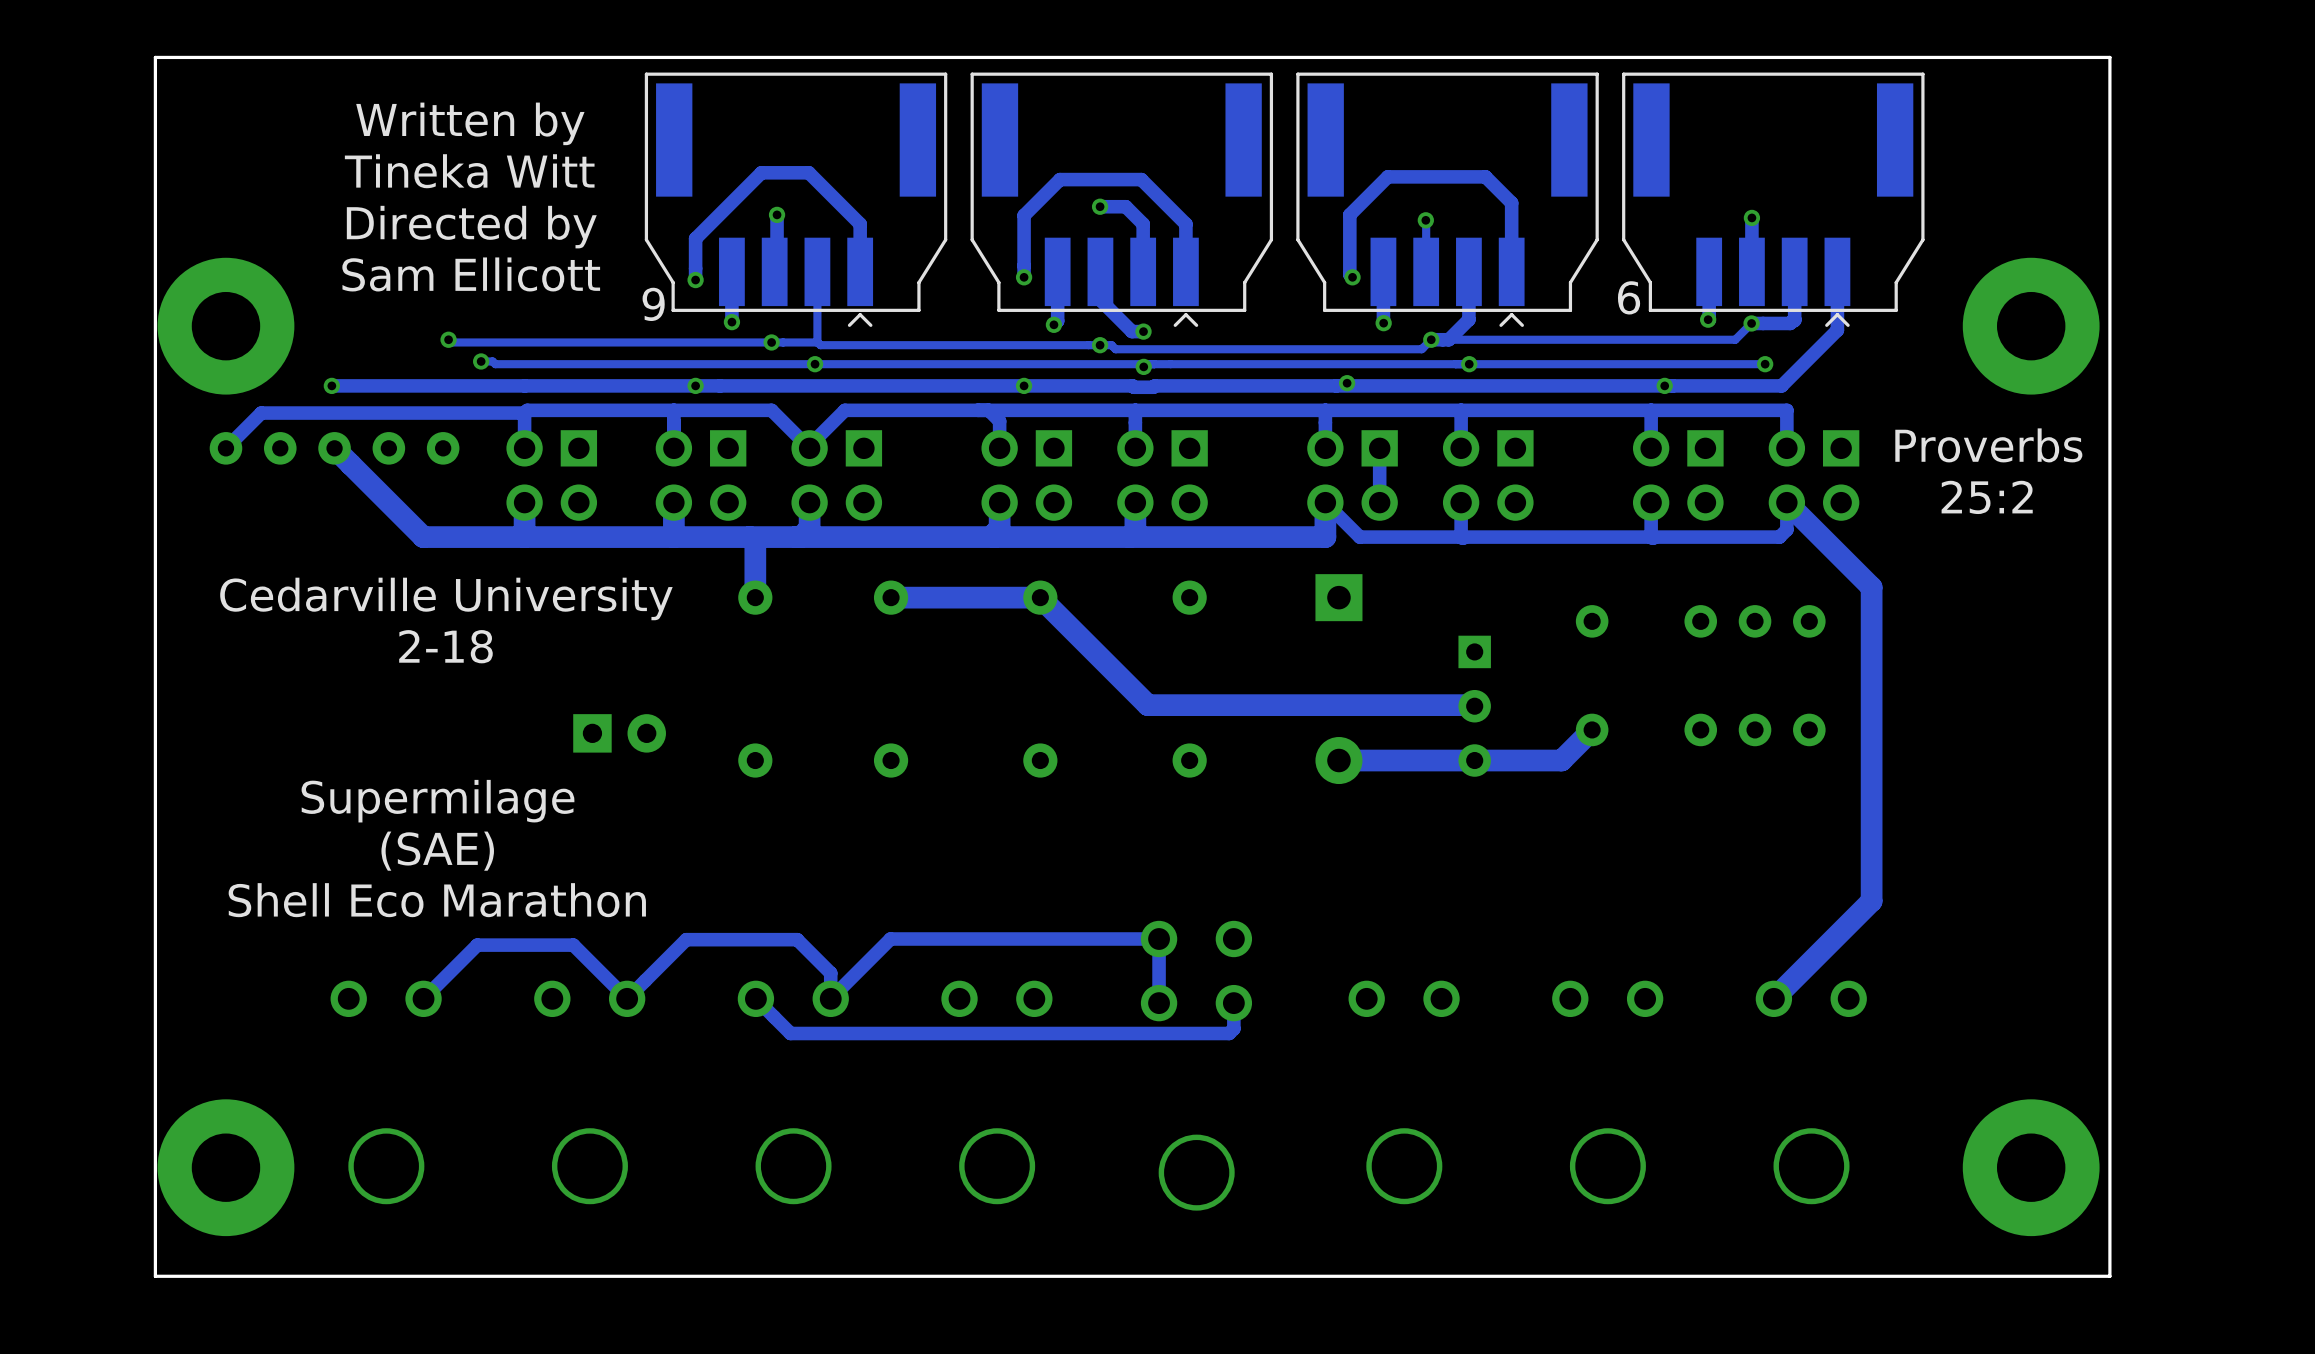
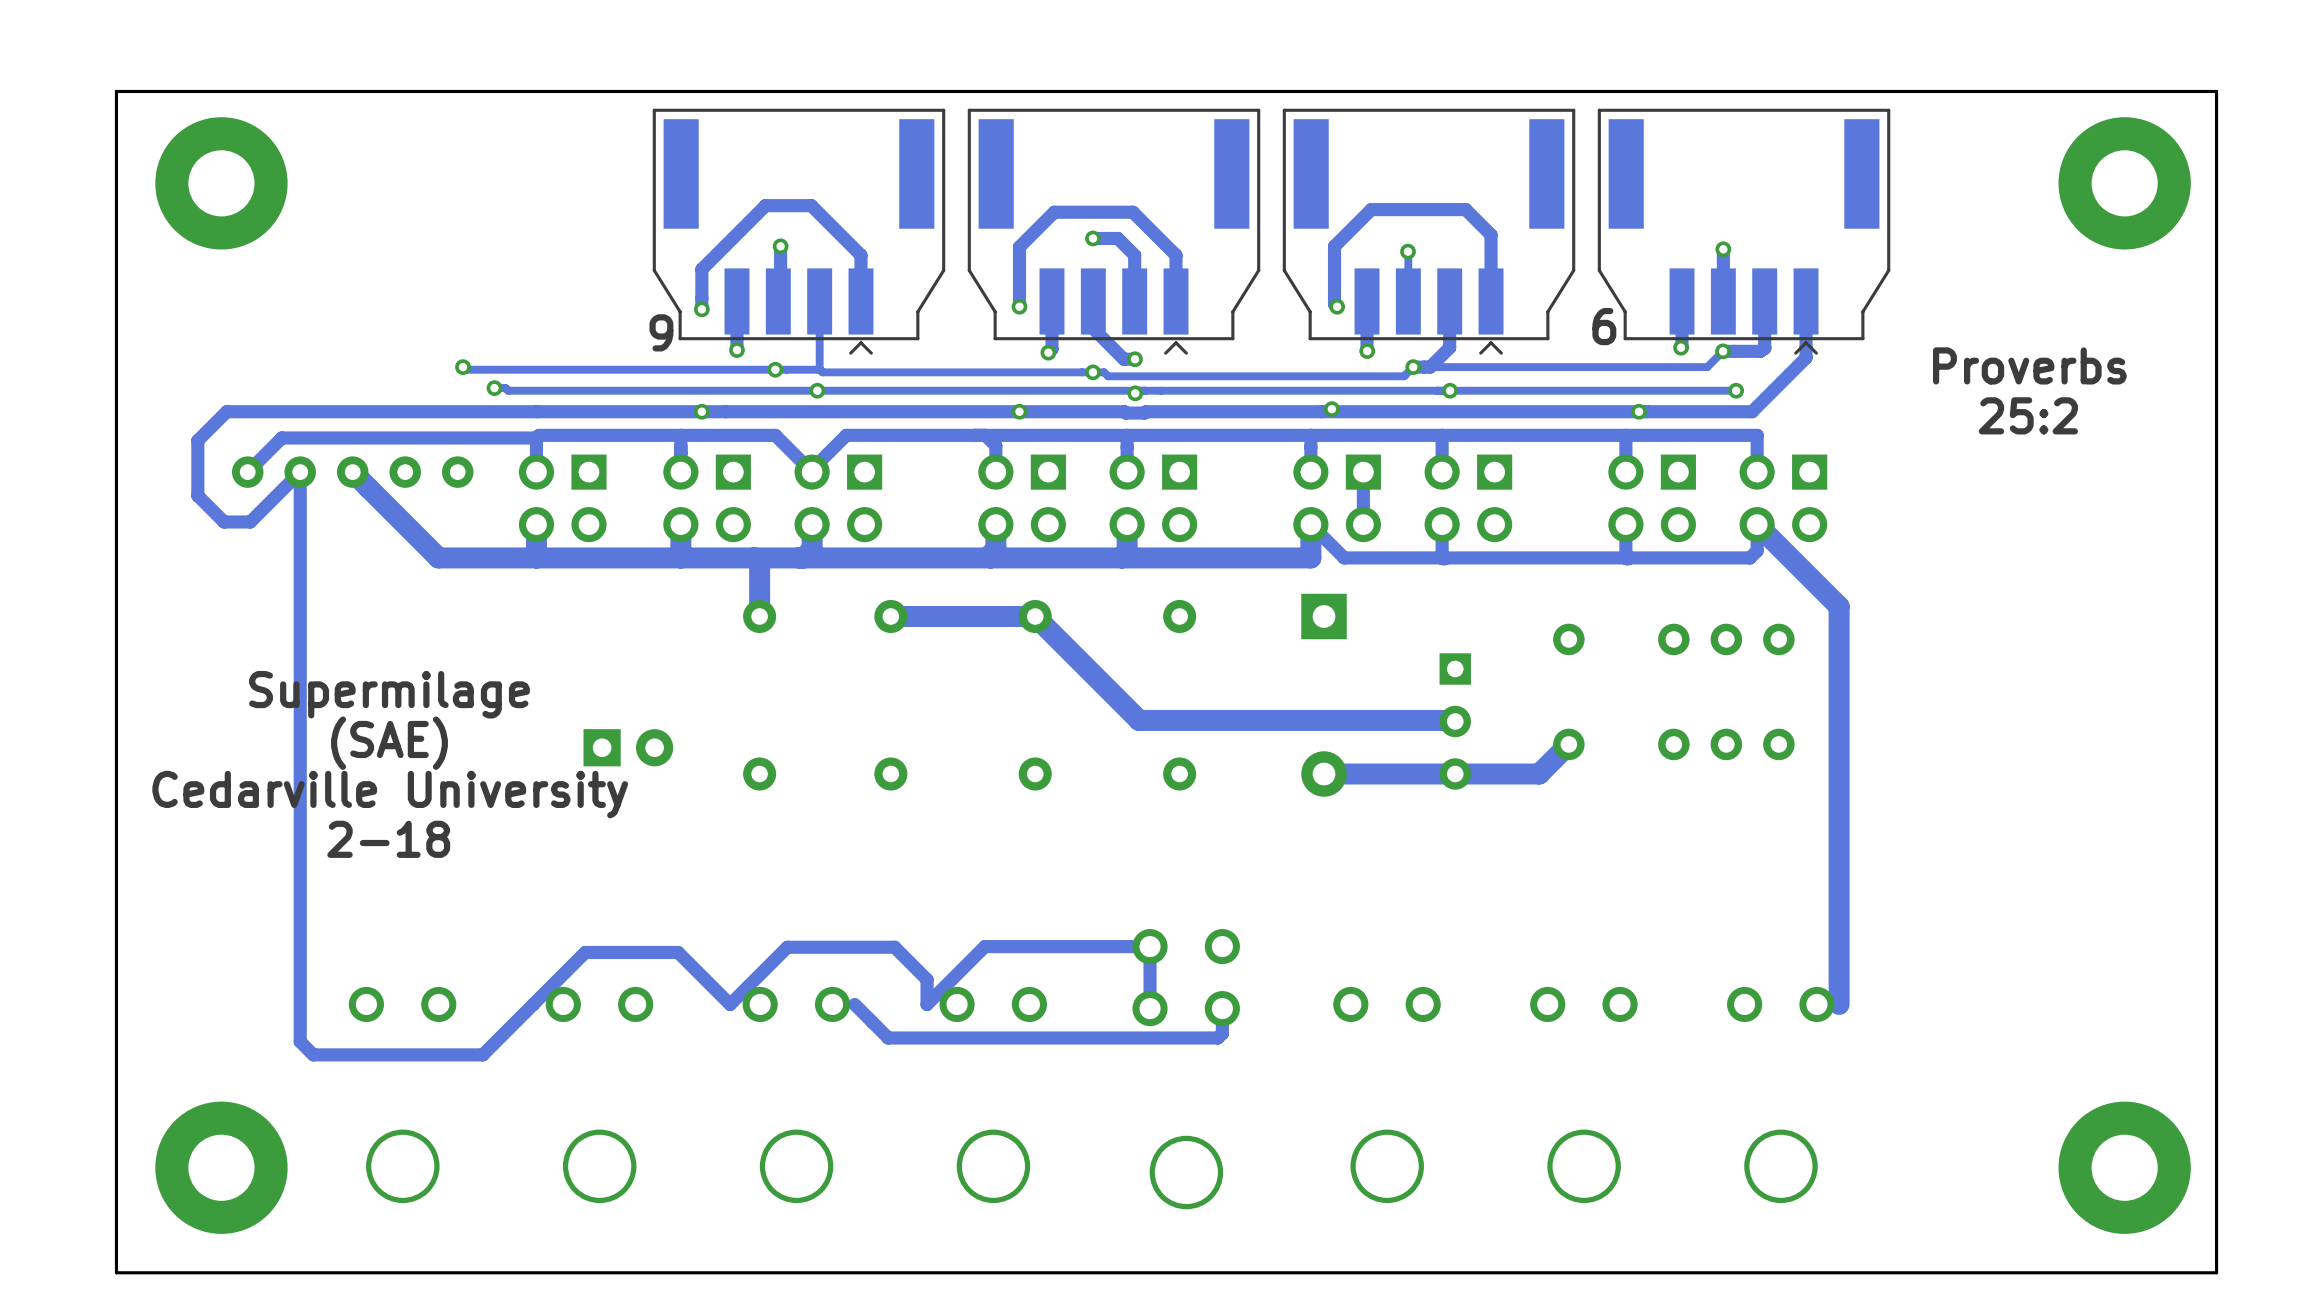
text: Written by (470, 123) -> none
text: Tineka Witt (469, 171) -> none
text: Directed by (471, 227) -> none
text: Sam Ellicott (471, 274) -> none
part position: (225, 326) -> (221, 183)
part position: (2031, 326) -> (2124, 183)
via: (331, 385) -> none
text position: Proverbs (1988, 445) -> Proverbs (2029, 365)
text position: 25:2 (1987, 497) -> 25:2 (2028, 415)
text position: Cedarville University (446, 598) -> Cedarville University (390, 794)
text position: 2-18 (445, 646) -> 2-18 (388, 839)
text position: Supermilage (438, 801) -> Supermilage (389, 694)
text position: (SAE) (437, 851) -> (SAE) (389, 743)
text: Shell Eco Marathon (437, 900) -> none
track: (1871, 901) (1773, 998) -> (1839, 909) (1839, 1004)
track: (784, 939) (686, 939) (627, 998) (573, 945) (477, 945) (423, 998) -> (787, 947) (730, 1004) (678, 952) (585, 952) (482, 1054) (313, 1054) (300, 1041) (300, 472) (250, 521) (224, 521) (197, 495) (197, 440) (226, 411) (350, 411)
track: (988, 939) (890, 939) (830, 998) (830, 973) (797, 939) -> (984, 946) (927, 1004) (927, 979) (894, 947) (800, 947)
track: (755, 998) (790, 1033) (888, 1033) -> (854, 1004) (888, 1037)
part position: (225, 1167) -> (221, 1167)
part position: (2031, 1167) -> (2124, 1167)
board edge: (2109, 1276) (2109, 57) (155, 57) (155, 1276) -> (2069, 1272) (2216, 1272) (2216, 91) (116, 91) (116, 1272) (179, 1272)

